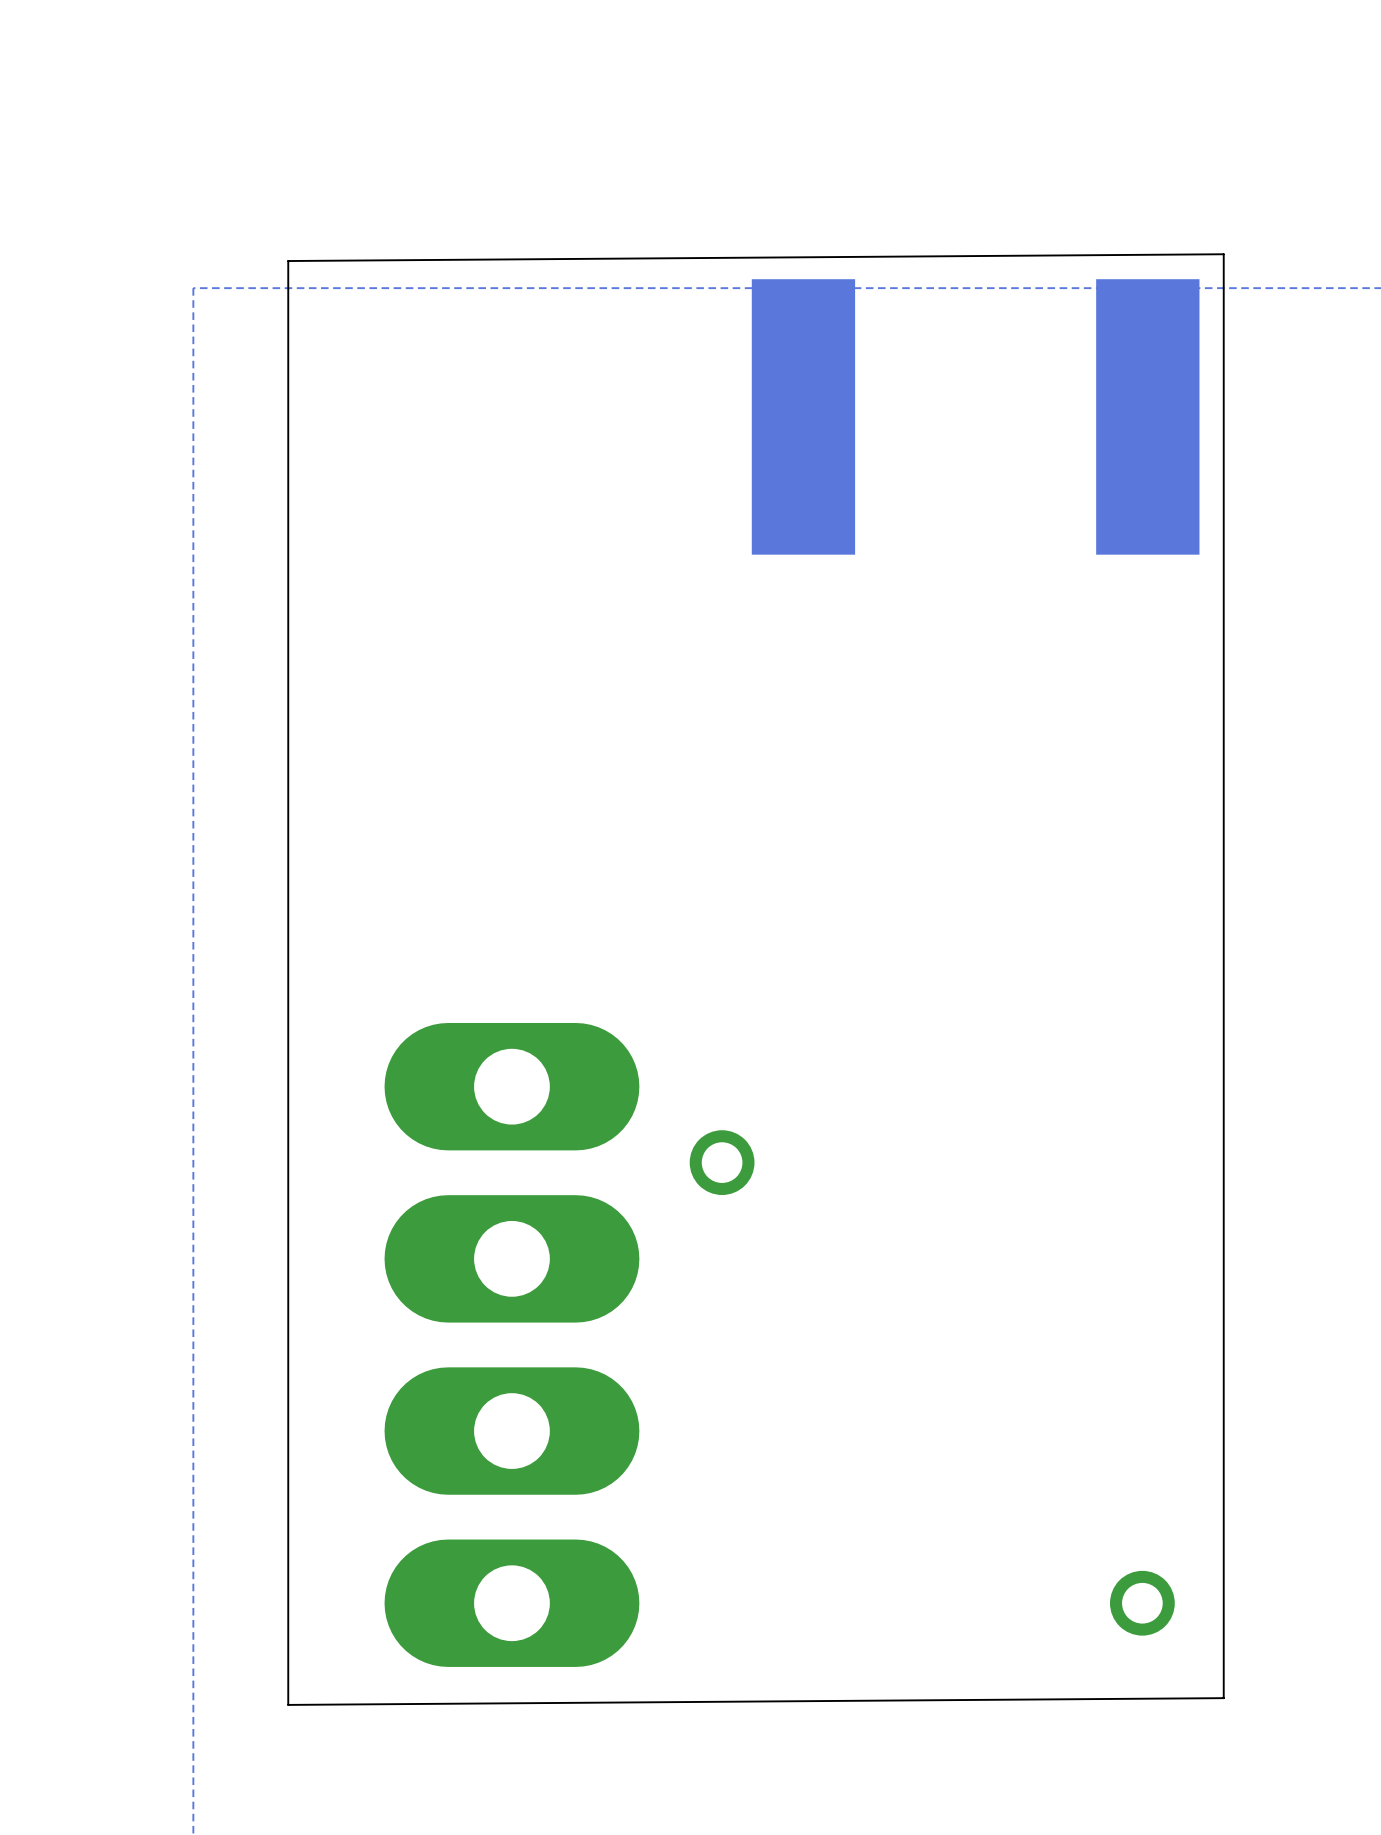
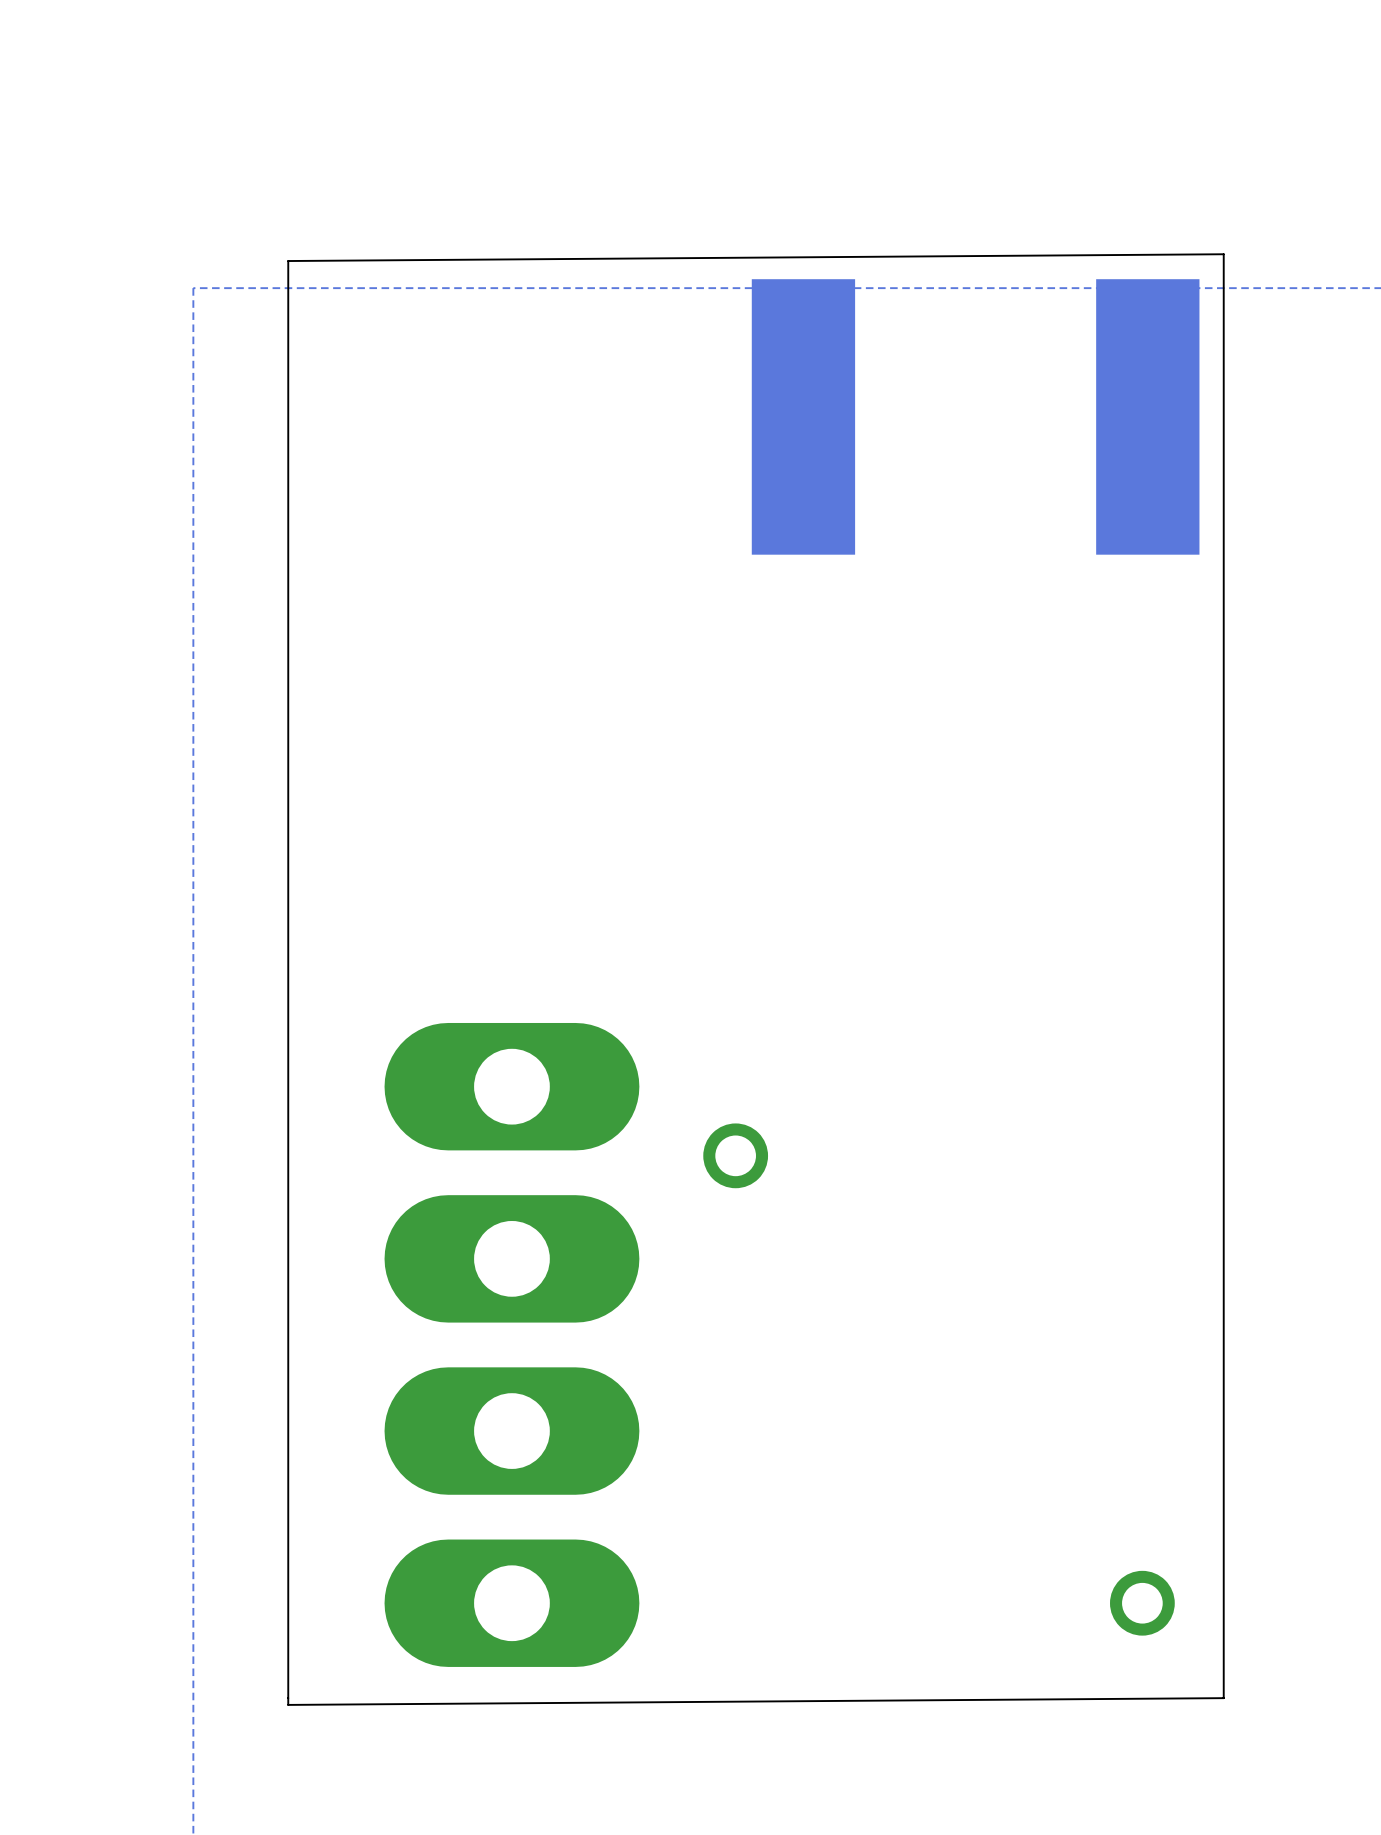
via position: (722, 1162) -> (735, 1155)

